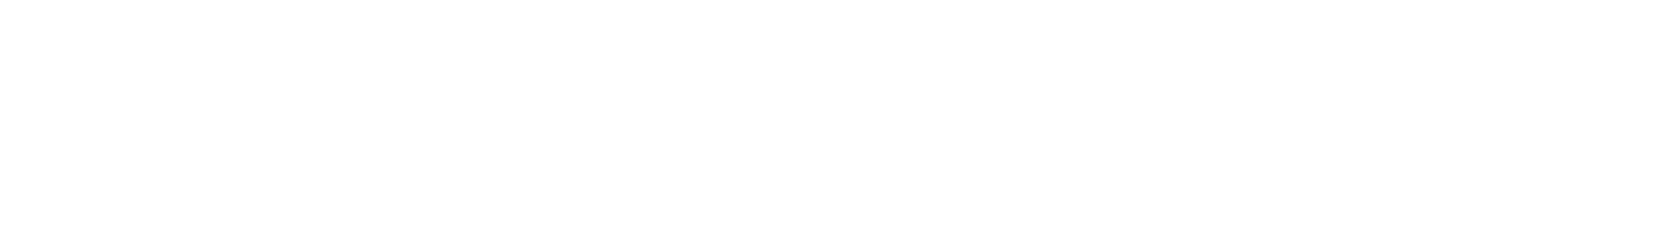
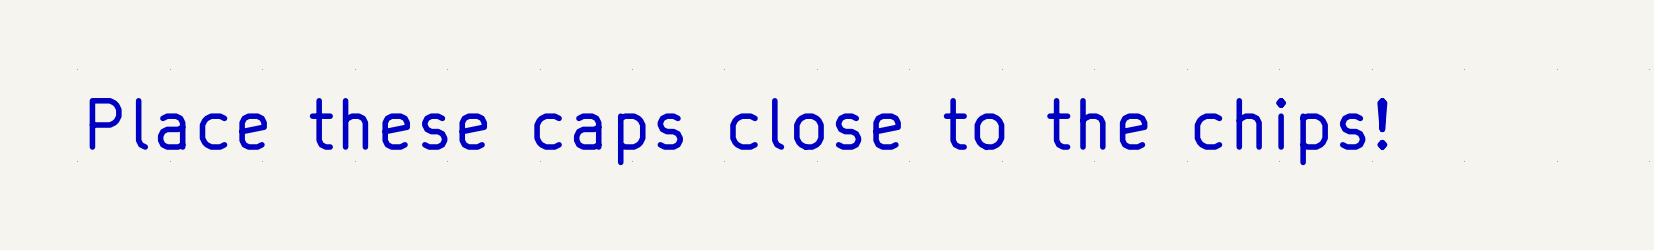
text: none -> Place these caps close to the chips! (738, 131)

